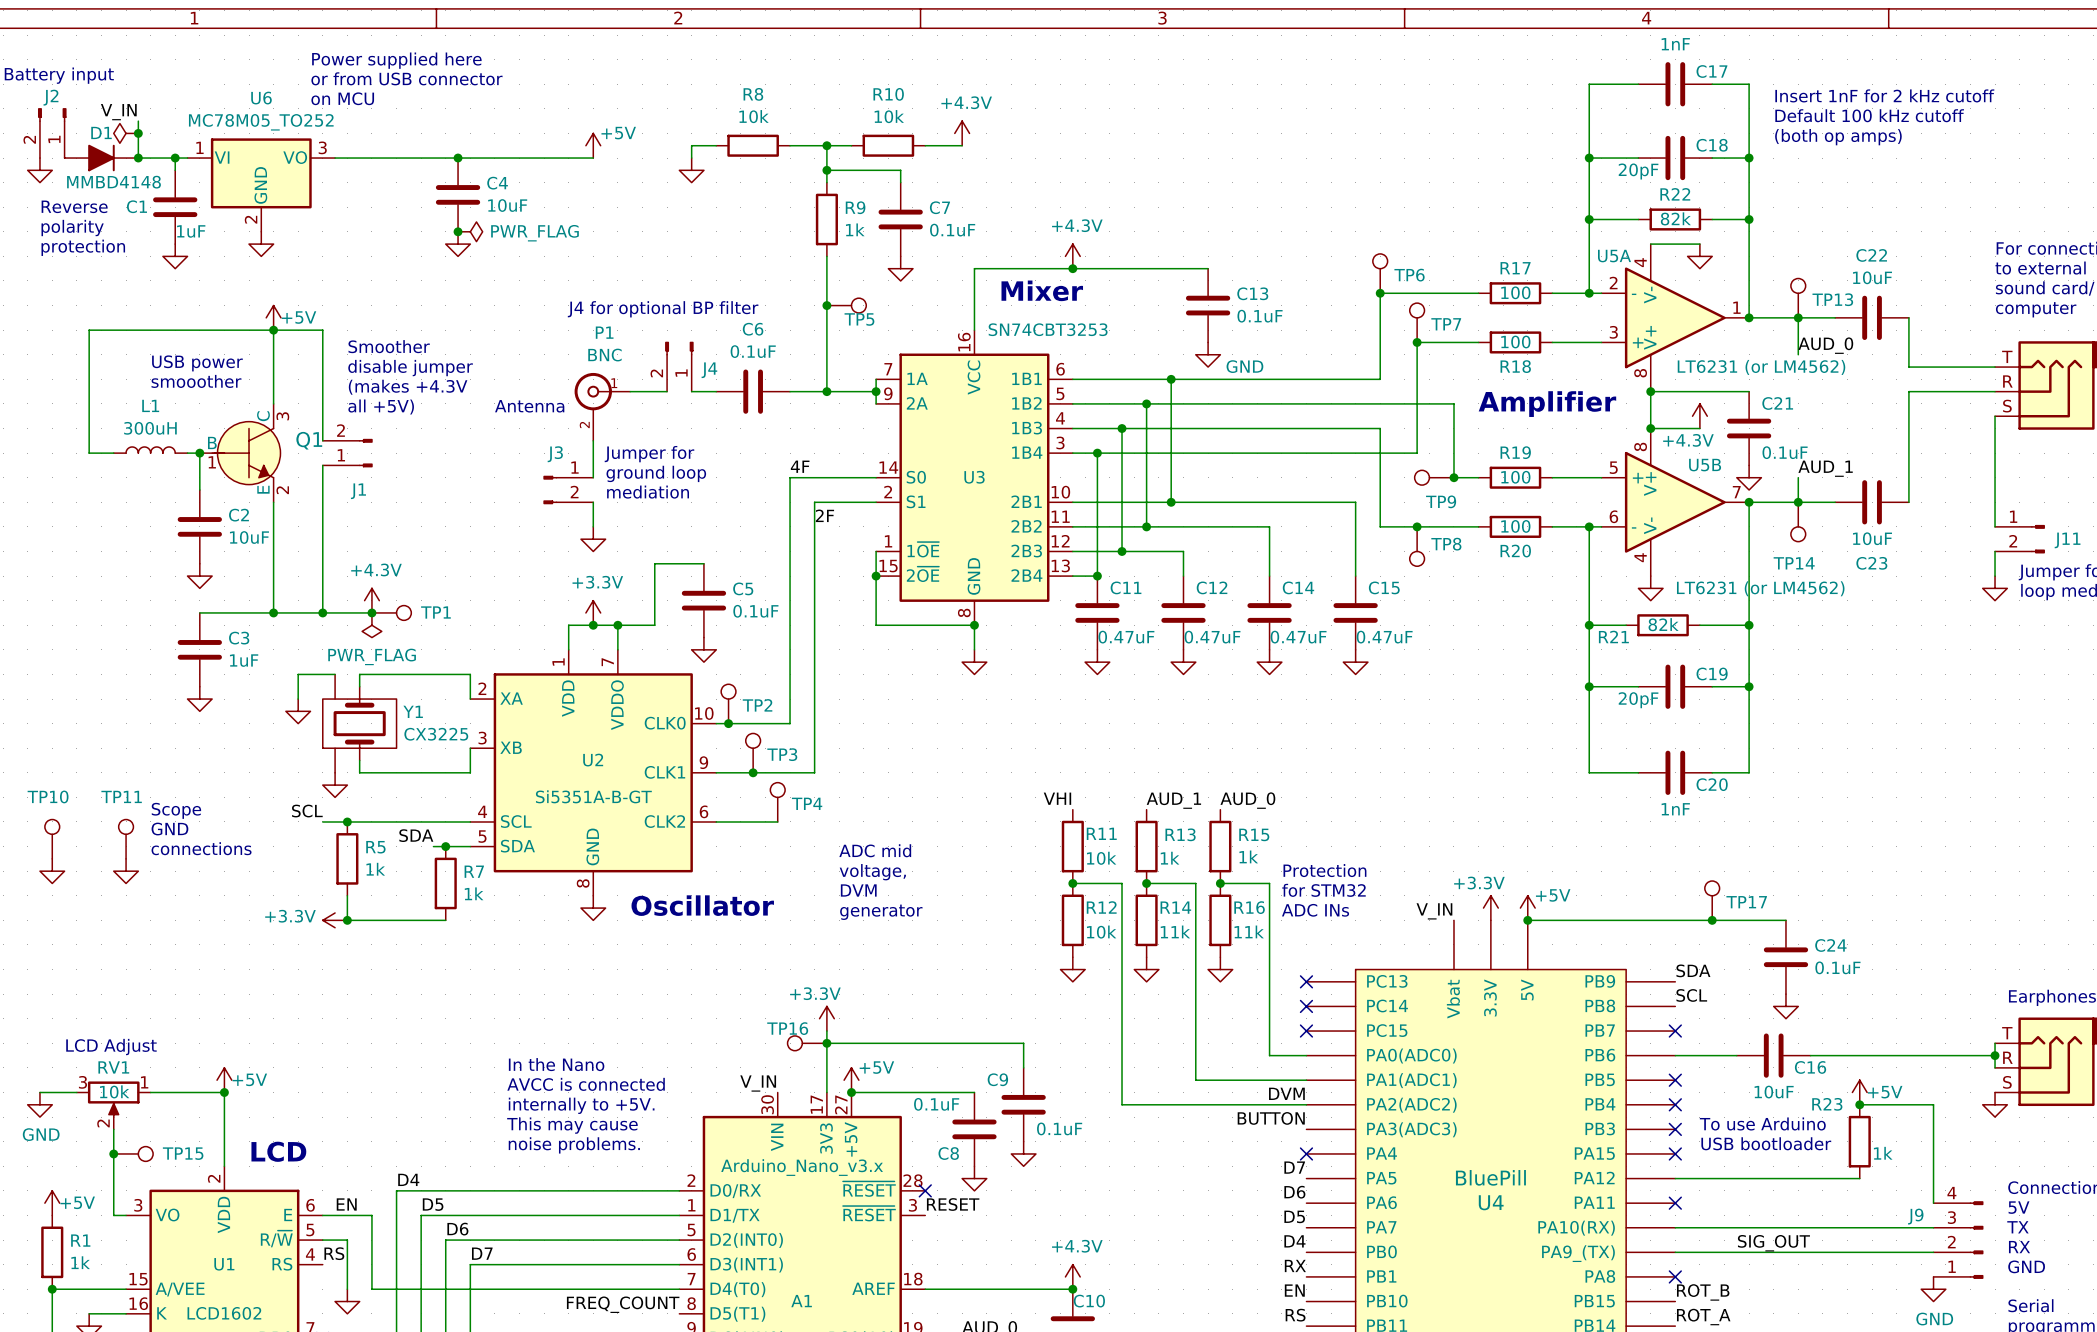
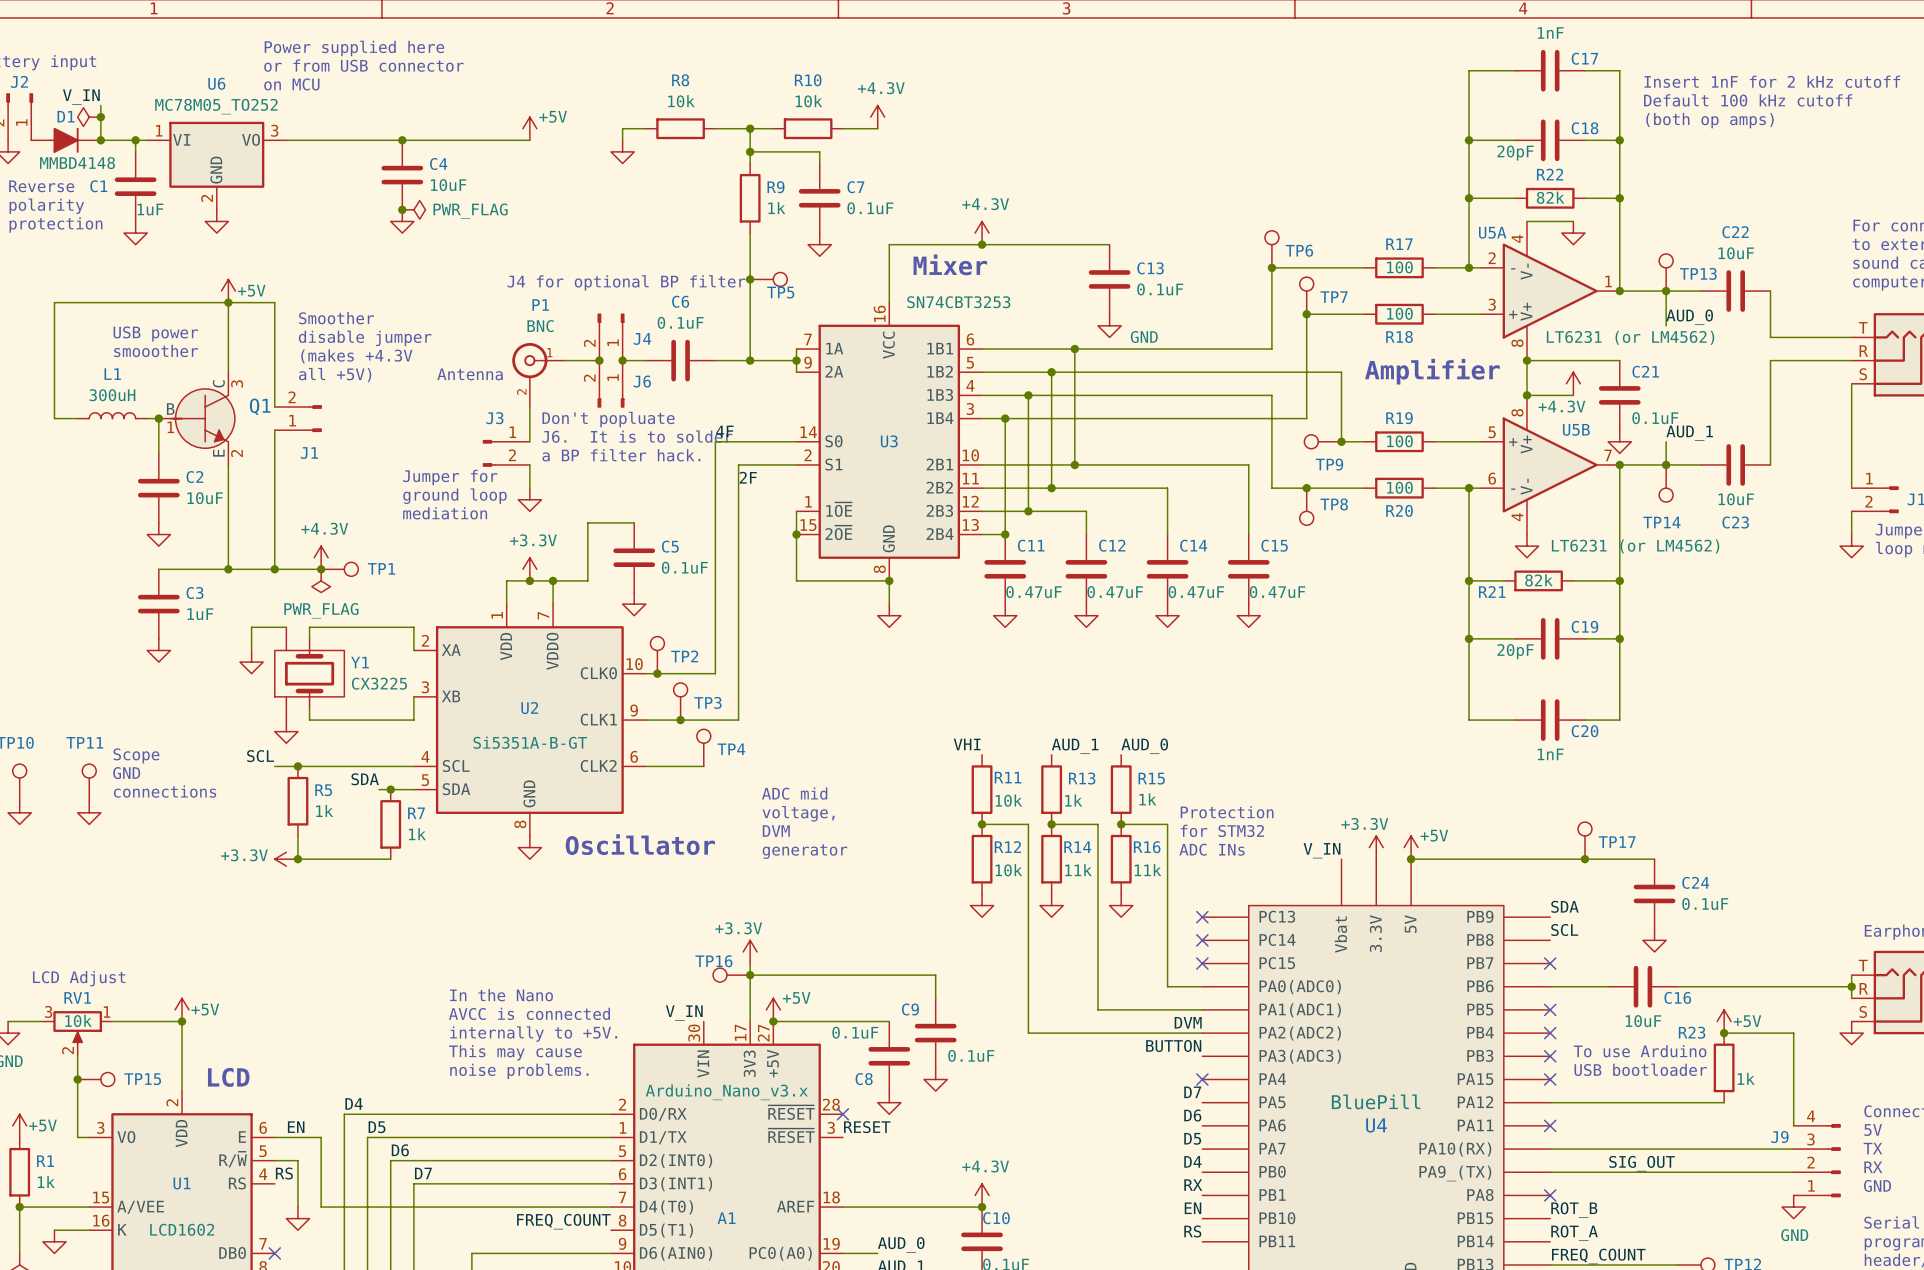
junction: none -> (599, 360)
junction: none -> (622, 360)
J6: none -> (611, 384)
text: Jumper for (649, 454) -> Don't popluate (608, 419)
text: ground loop (656, 473) -> J6. It is to solder (637, 436)
text: mediation (648, 492) -> a BP filter hack. (621, 455)
text: none -> Jumper for (450, 477)
text: none -> ground loop (454, 496)
text: none -> mediation (445, 513)

